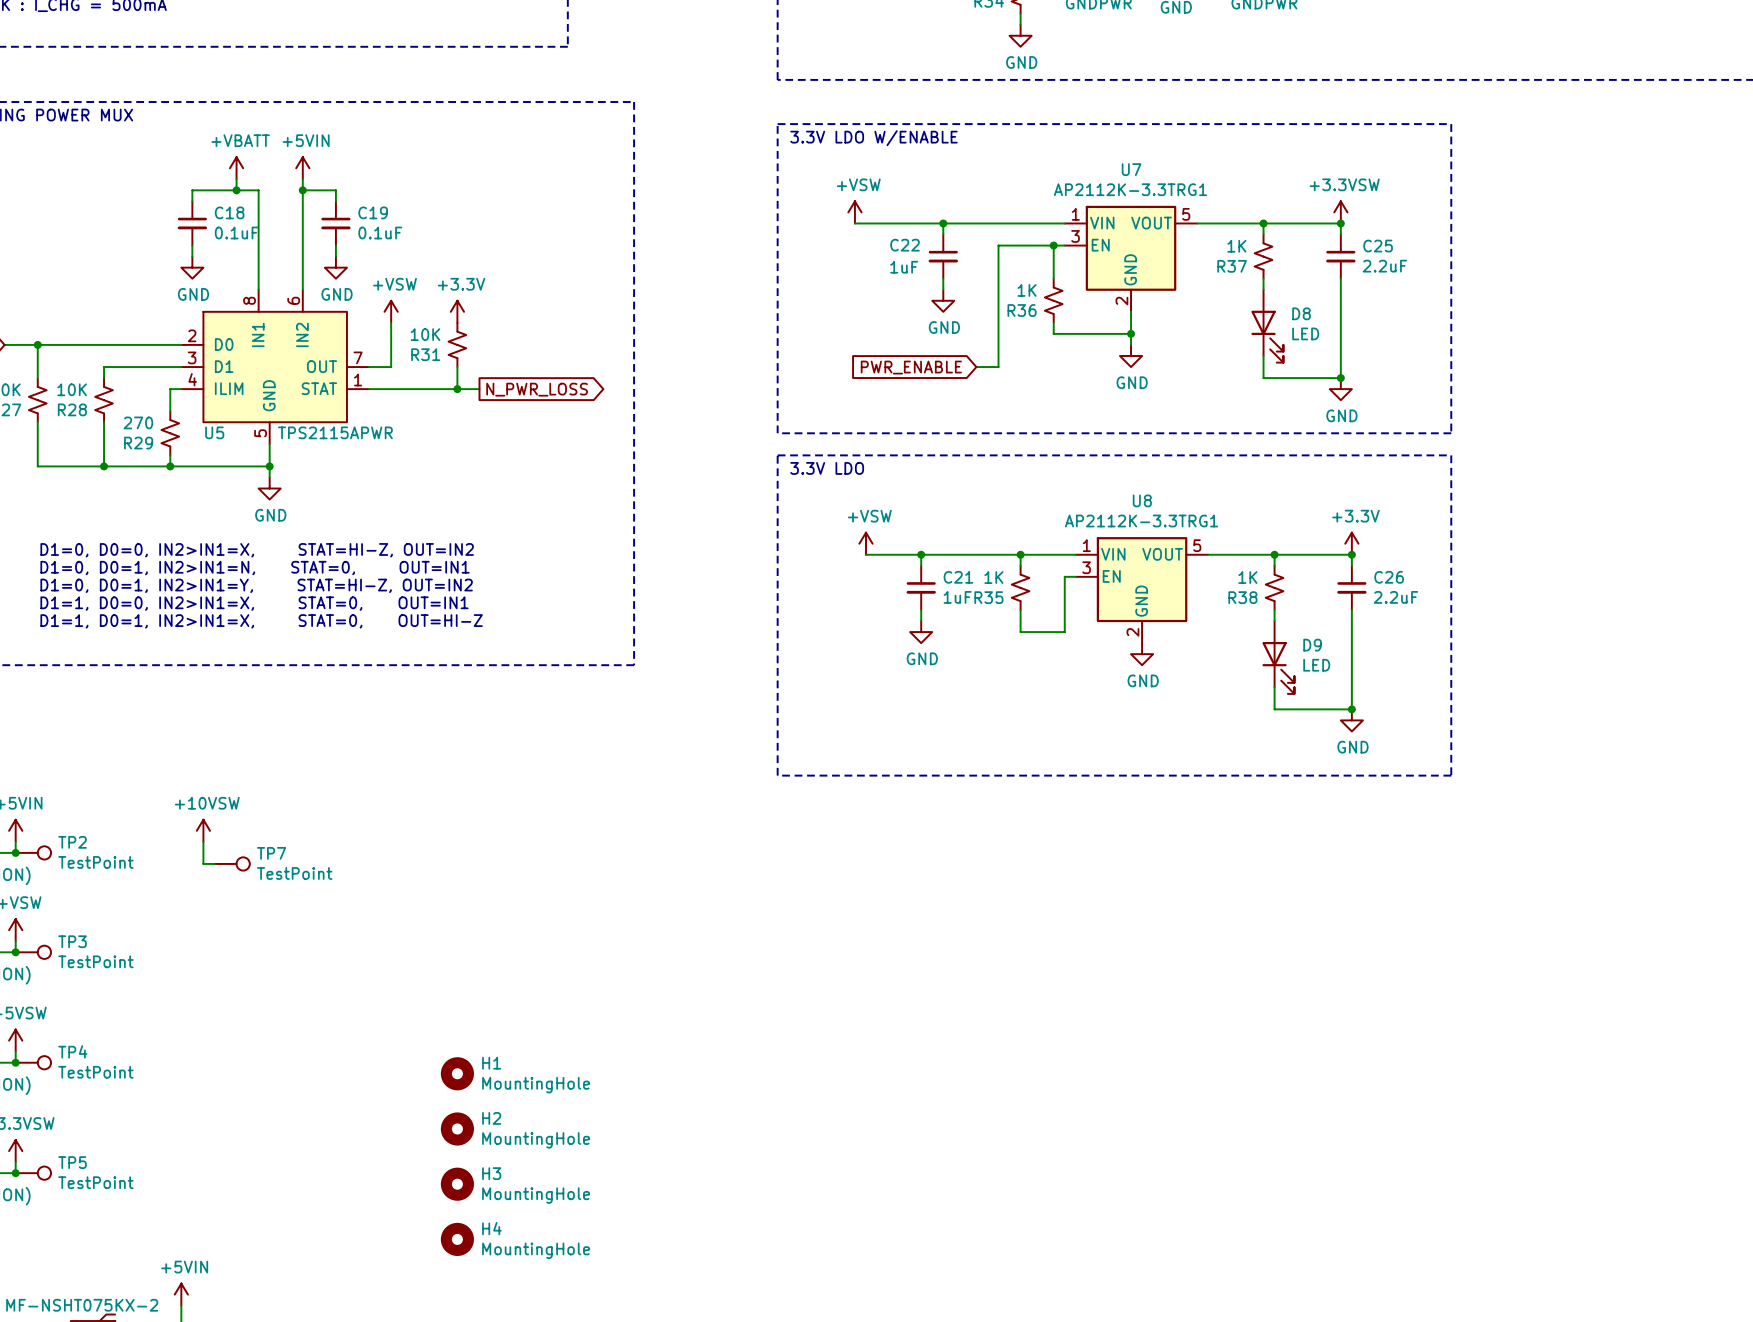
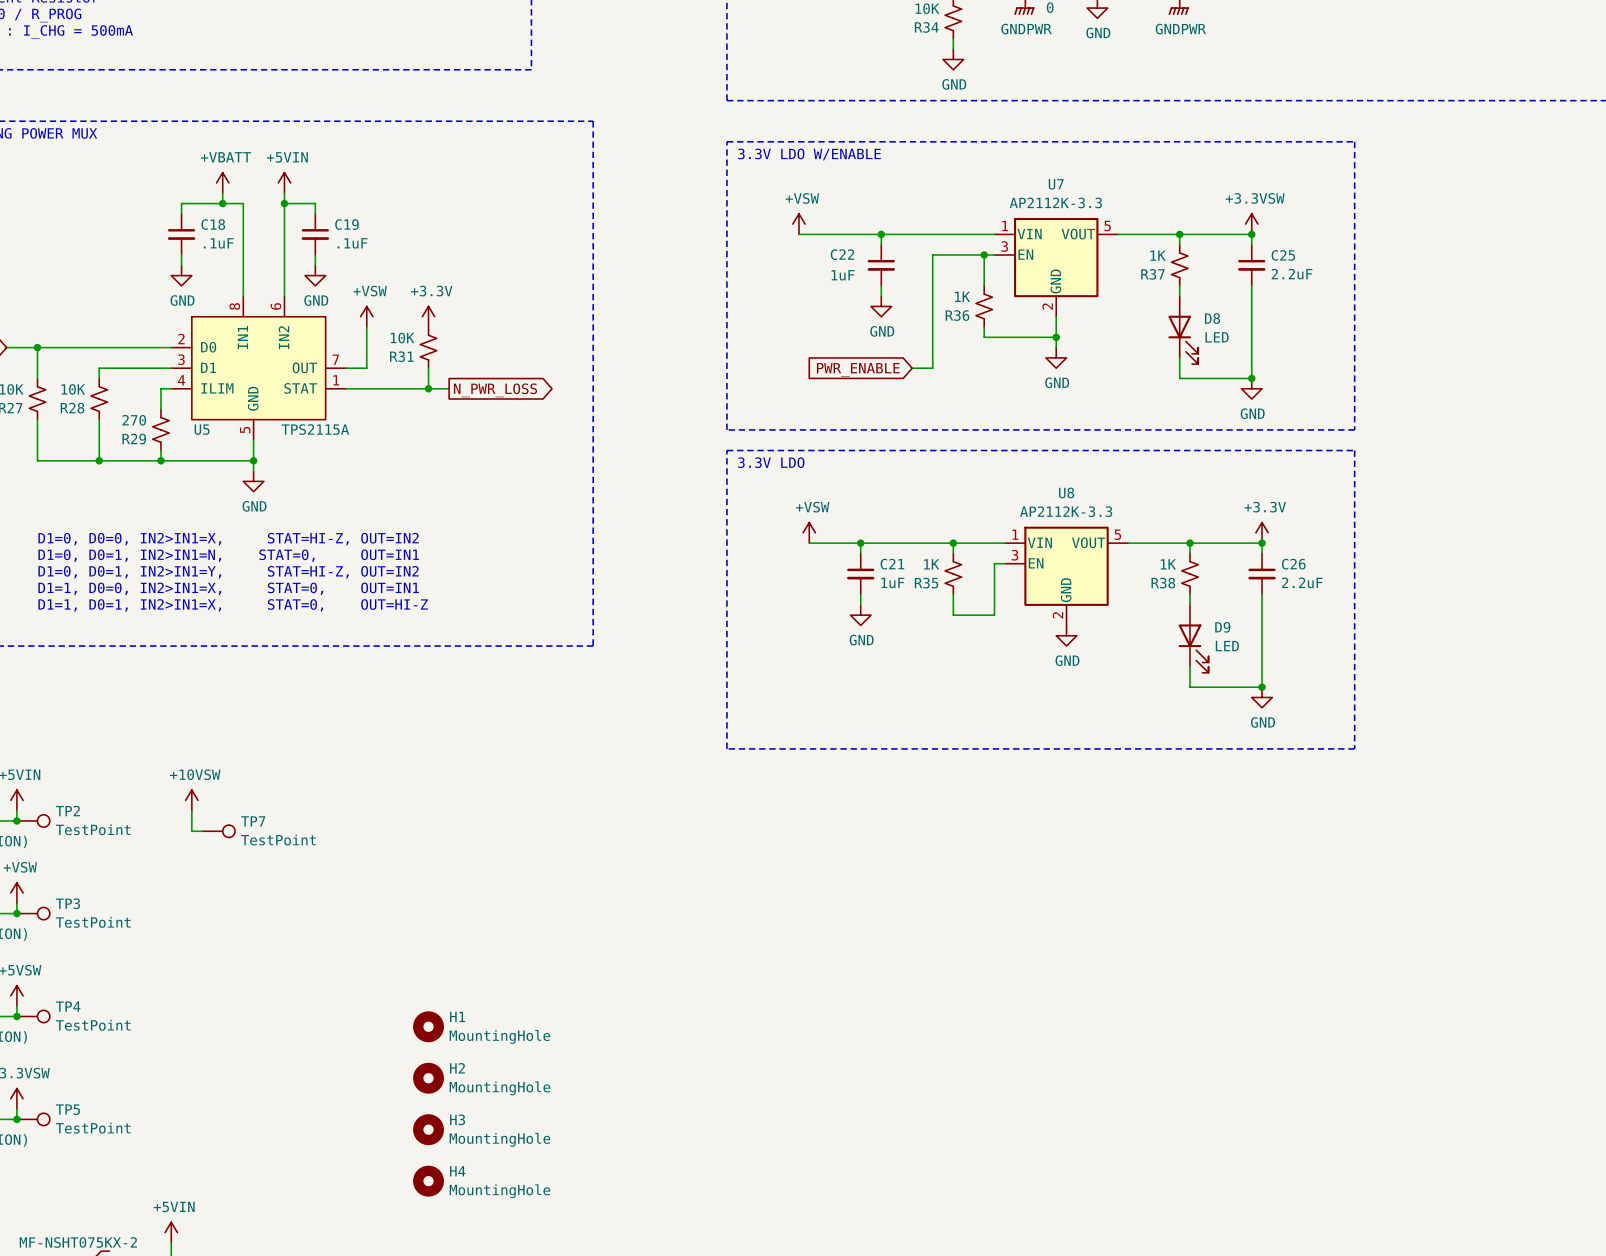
U7 value: AP2112K-3.3TRG1 (1130, 189) -> AP2112K-3.3 (1055, 202)
C18 value: 0.1uF (236, 233) -> .1uF (218, 243)
C19 value: 0.1uF (380, 233) -> .1uF (352, 243)
U5 value: TPS2115APWR (335, 432) -> TPS2115A (315, 429)
U8 value: AP2112K-3.3TRG1 (1141, 521) -> AP2112K-3.3 (1066, 511)

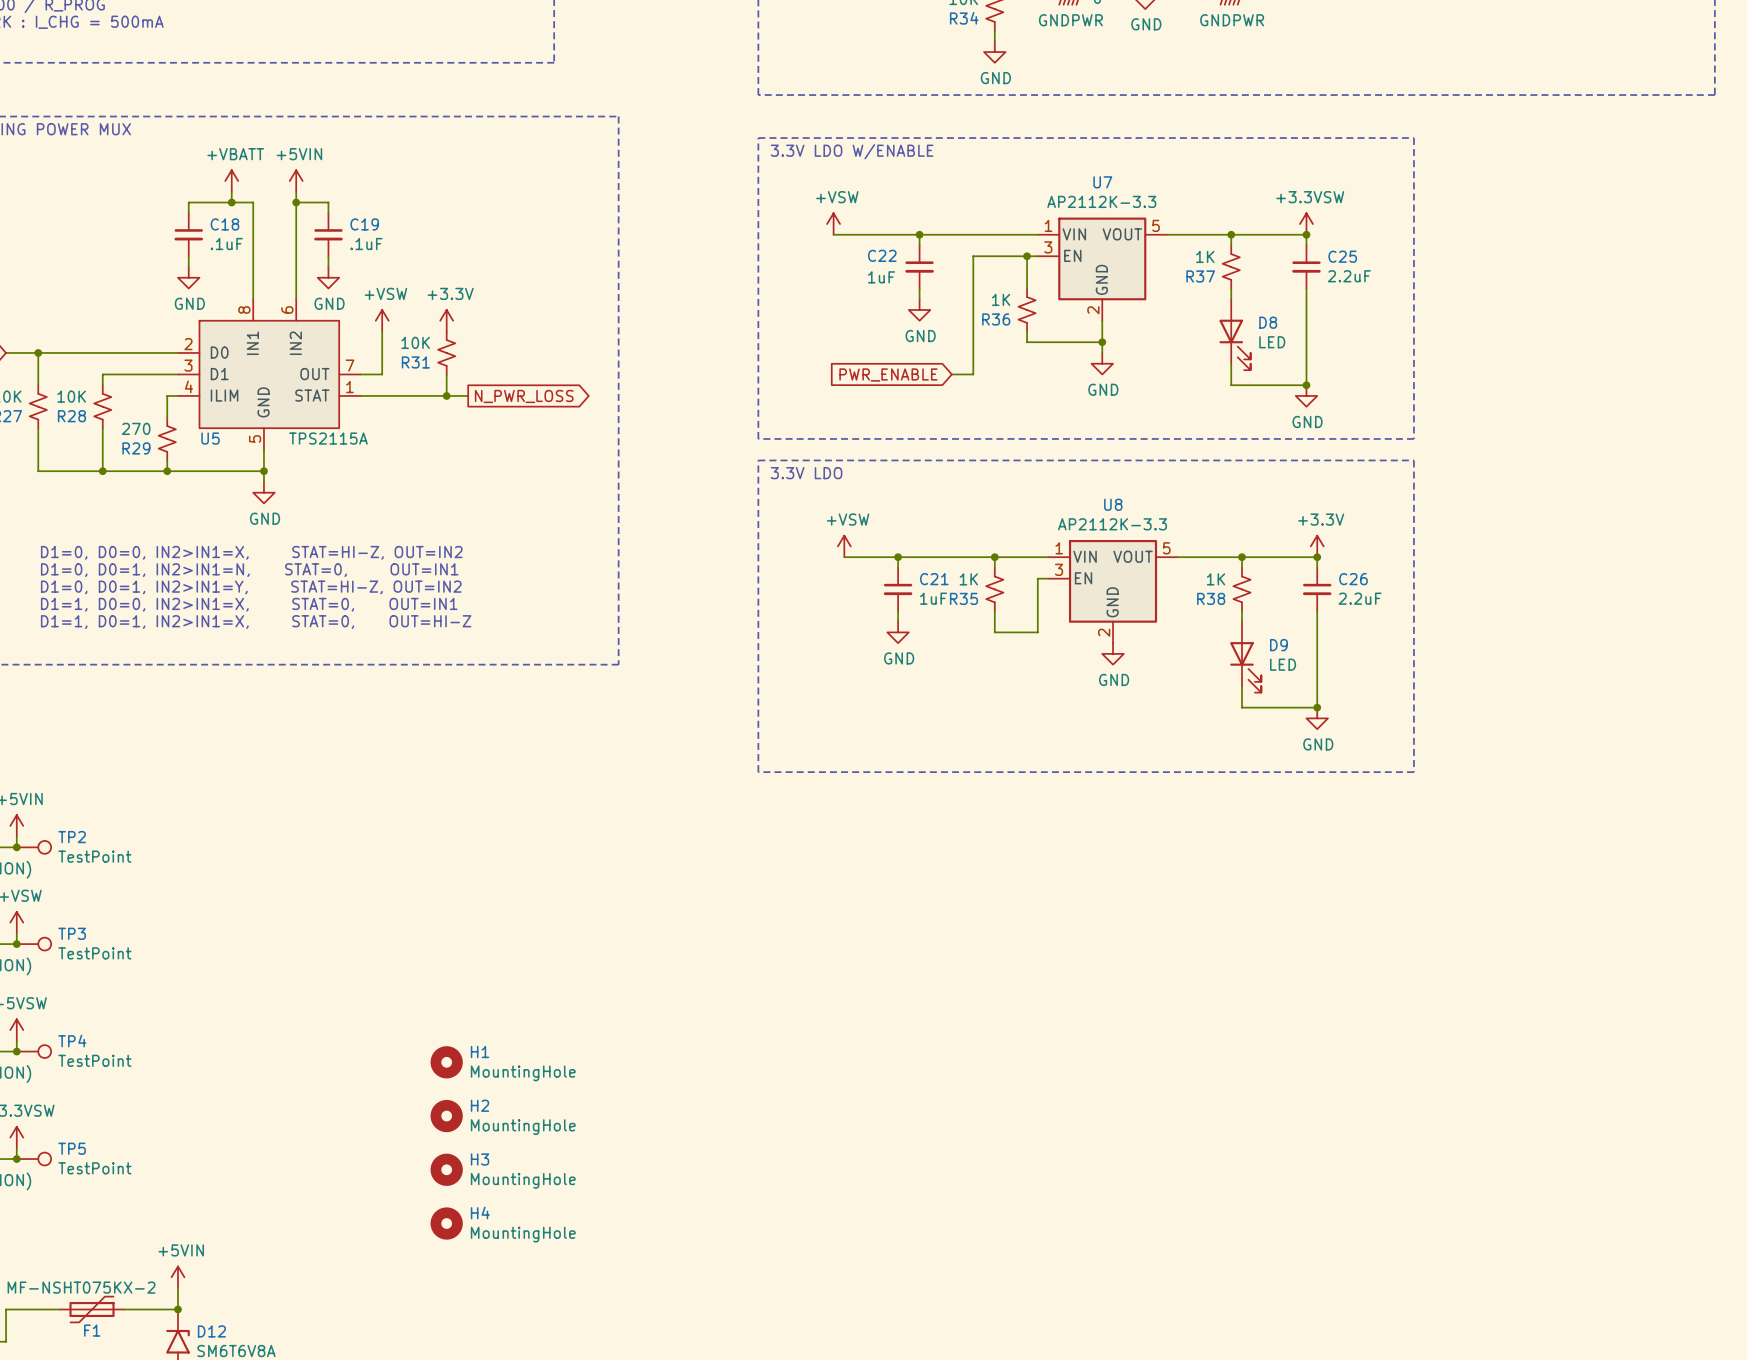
power symbol: +10VSW (191, 800) -> none
wire: (191, 810) (191, 831) (202, 831) -> none
TP7: TestPoint (218, 831) -> none

